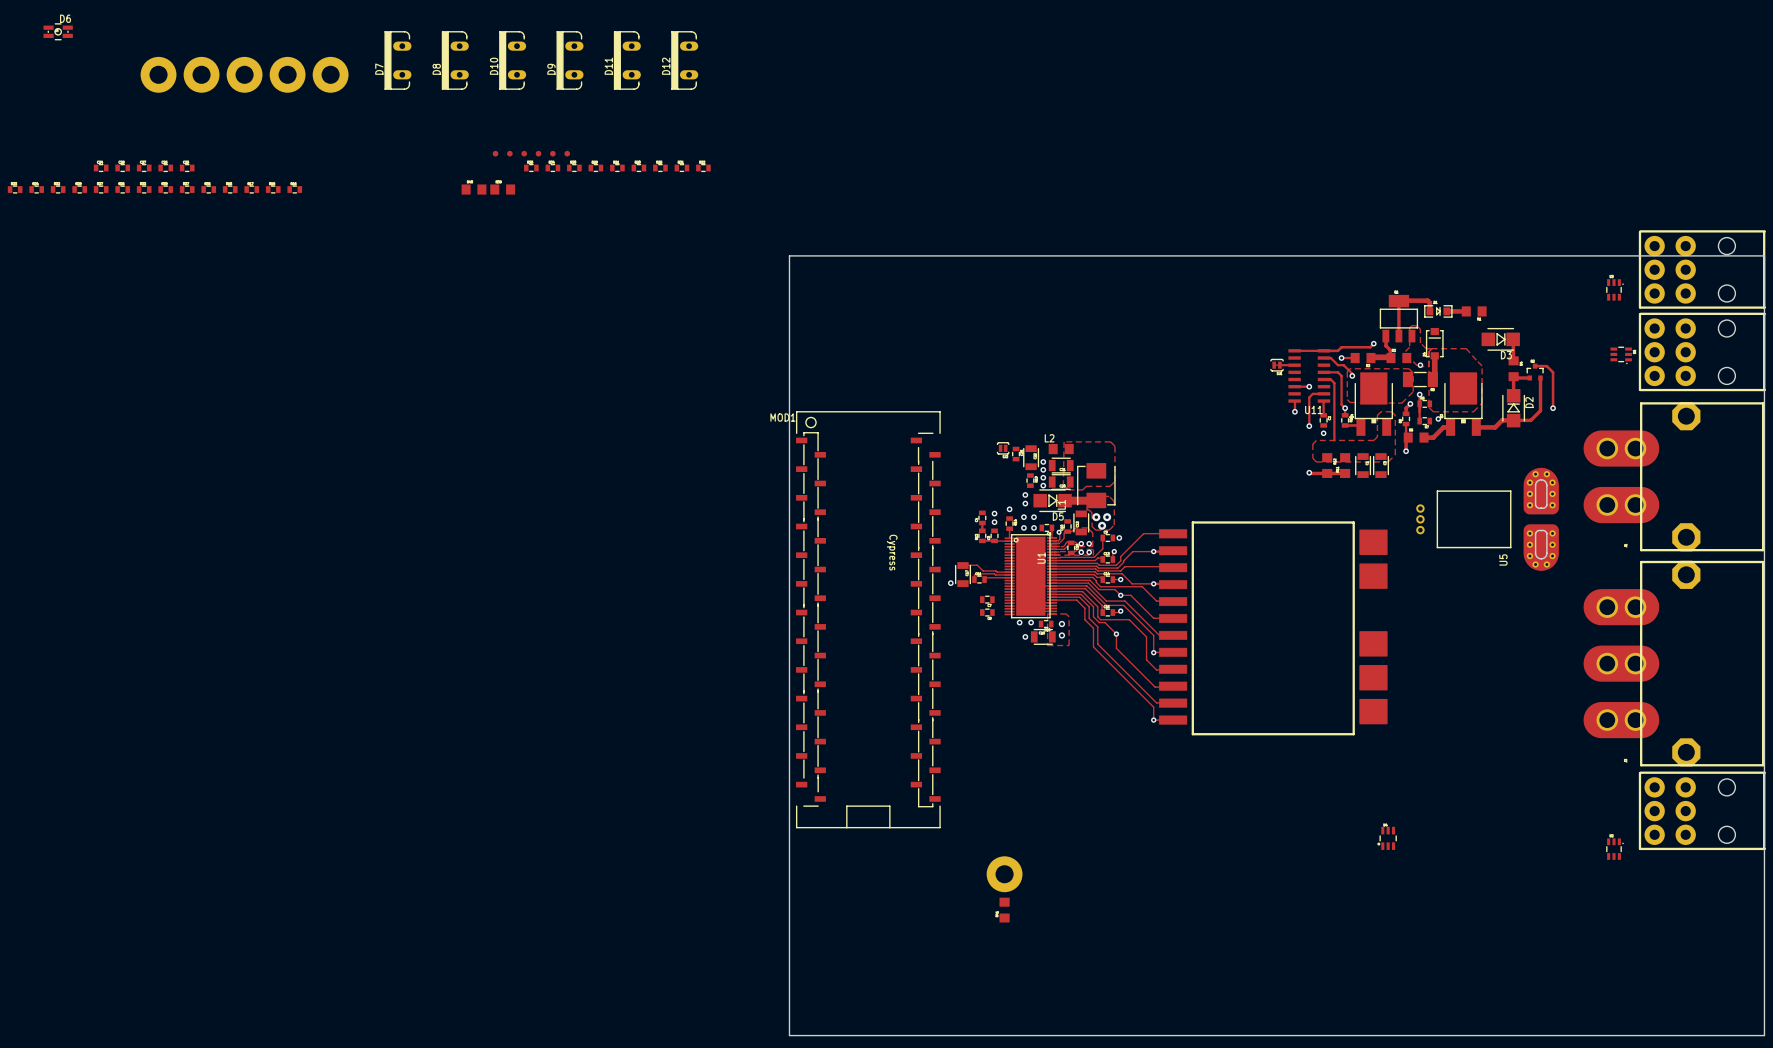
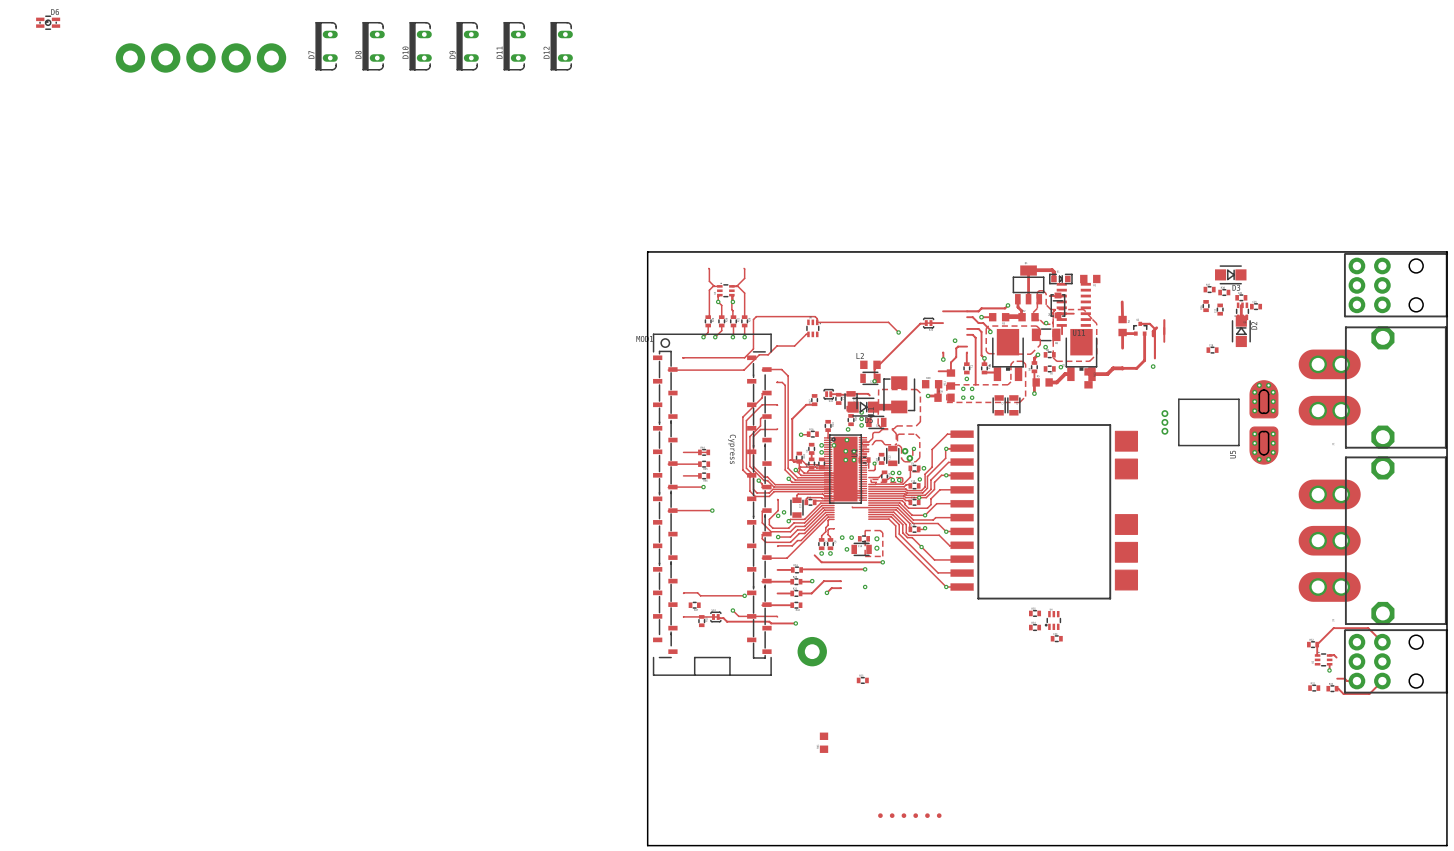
part: (495, 153) -> none
part: (509, 153) -> none
part: (524, 153) -> none
part: (538, 153) -> none
part: (552, 153) -> none
part: (567, 153) -> none
part position: (101, 168) -> (1056, 638)
part position: (122, 168) -> (1212, 350)
part rotation: 0° (144, 168) -> 90° clockwise (1220, 309)
part position: (144, 168) -> (1220, 309)
part position: (165, 168) -> (1241, 297)
part position: (187, 168) -> (1256, 306)
part position: (531, 168) -> (1035, 613)
part position: (552, 168) -> (1035, 627)
part rotation: 0° (574, 168) -> 90° clockwise (721, 321)
part position: (574, 168) -> (721, 321)
part rotation: 0° (595, 168) -> 90° clockwise (708, 321)
part position: (595, 168) -> (708, 321)
part rotation: 0° (617, 168) -> 90° clockwise (733, 321)
part position: (617, 168) -> (733, 321)
part rotation: 0° (638, 168) -> 90° clockwise (744, 321)
part position: (638, 168) -> (744, 321)
part position: (660, 168) -> (862, 680)
part position: (681, 168) -> (1314, 688)
part position: (703, 168) -> (796, 593)
part position: (15, 189) -> (796, 581)
part position: (36, 189) -> (796, 569)
part position: (58, 189) -> (1313, 644)
part: (79, 189) -> none
part: (101, 189) -> none
part: (122, 189) -> none
part position: (144, 189) -> (1332, 688)
part position: (165, 189) -> (1224, 292)
part position: (187, 189) -> (1209, 289)
part rotation: 0° (208, 189) -> 90° clockwise (1206, 306)
part position: (208, 189) -> (1206, 306)
part rotation: 0° (230, 189) -> 90° clockwise (701, 621)
part position: (230, 189) -> (701, 621)
part rotation: 0° (251, 189) -> 90° clockwise (814, 400)
part position: (251, 189) -> (814, 400)
part rotation: 0° (273, 189) -> 90° clockwise (799, 457)
part position: (273, 189) -> (799, 457)
part position: (294, 189) -> (812, 434)
part position: (474, 189) -> (932, 384)
part position: (502, 189) -> (944, 397)
part: (1702, 269) -> none
part rotation: 0° (1615, 289) -> 90° counterclockwise (725, 289)
part position: (1615, 289) -> (725, 289)
board edge: (789, 311) (789, 255) (1764, 255) (1764, 1035) -> (647, 251) (1447, 251) (1446, 845)
track: (1429, 311) (1429, 302) (1427, 300) (1399, 300) (1398, 336) -> none
part position: (1438, 311) -> (1060, 279)
track: (1446, 311) (1466, 311) -> none
part position: (1474, 311) -> (1090, 279)
part position: (1398, 318) -> (1028, 284)
track: none -> (708, 268) (709, 281) (714, 286)
track: none -> (744, 268) (744, 278) (736, 286)
track: (1385, 336) (1386, 345) (1390, 350) (1390, 357) -> none
track: (1513, 339) (1513, 360) -> none
track: (1373, 343) (1370, 347) (1341, 347) (1337, 350) (1294, 350) -> none
via: (1373, 343) -> none
part position: (1434, 343) -> (1057, 305)
track: none -> (1053, 279) (1052, 270) (1028, 270) (1028, 299)
zone outline: (1431, 348) (1429, 351) (1429, 407) (1433, 411) (1473, 411) (1482, 403) (1482, 365) (1466, 348) (1426, 348) (1420, 342) (1420, 329) (1416, 325) (1411, 325) (1409, 327) (1409, 347) (1403, 353) (1403, 360) (1413, 361) (1418, 366) (1429, 366) -> none
track: none -> (719, 286) (713, 286) (709, 290) (708, 317)
track: none -> (731, 286) (737, 286) (744, 293) (744, 317)
track: (1434, 355) (1434, 377) (1432, 379) -> none
part rotation: 0° (1621, 355) -> 90° clockwise (1241, 311)
part position: (1621, 355) -> (1241, 311)
track: (1390, 357) (1370, 358) -> none
track: (1323, 358) (1330, 358) (1337, 365) (1343, 365) (1352, 375) -> none
track: (1341, 358) (1355, 358) -> none
via: (1341, 358) -> none
part position: (1363, 358) -> (999, 317)
part position: (1398, 358) -> (1028, 317)
part position: (1277, 365) -> (928, 323)
via: (1420, 365) -> none
track: none -> (718, 296) (719, 295) (718, 301) (721, 305) (721, 317)
track: (1535, 366) (1546, 366) (1553, 372) (1553, 408) -> none
zone outline: (1350, 368) (1408, 368) (1413, 373) (1413, 391) (1401, 403) (1350, 402) (1347, 399) (1347, 371) (1350, 368) -> none
part position: (1513, 368) -> (1122, 326)
track: none -> (1017, 299) (1017, 307) (1021, 310) (1021, 316)
via: none -> (718, 301)
track: none -> (732, 301) (731, 295) (733, 317)
via: none -> (732, 301)
track: (1323, 372) (1337, 372) (1341, 375) (1341, 404) (1345, 408) (1345, 415) -> none
track: none -> (1122, 301) (1122, 319)
part position: (1535, 372) -> (1140, 328)
via: (1352, 375) -> none
track: none -> (1007, 305) (1005, 308) (981, 308) (978, 311) (943, 311)
via: none -> (1007, 305)
track: (1513, 378) (1529, 378) -> none
track: (1540, 378) (1540, 410) (1530, 420) (1502, 420) (1495, 427) (1476, 427) -> none
track: (1323, 379) (1330, 379) (1334, 383) (1334, 440) -> none
part position: (1420, 379) -> (1046, 334)
zone outline: none -> (1055, 309) (1053, 311) (1053, 357) (1056, 361) (1089, 361) (1096, 354) (1096, 323) (1083, 309) (1050, 309) (1046, 304) (1046, 293) (1043, 290) (1039, 290) (1037, 292) (1037, 308) (1032, 313) (1032, 319) (1040, 320) (1044, 324) (1053, 324)
via: (1309, 386) -> none
track: none -> (1021, 316) (1005, 317)
track: none -> (967, 317) (972, 317) (978, 323) (983, 323) (990, 331)
track: none -> (981, 317) (992, 317)
via: none -> (981, 317)
track: (1323, 393) (1312, 393) (1309, 397) (1309, 426) -> none
via: (1419, 394) -> none
track: none -> (926, 323) (920, 323) (874, 369) (874, 381)
track: none -> (930, 323) (943, 323)
via: none -> (1046, 323)
track: none -> (1140, 323) (1149, 323) (1154, 328) (1154, 358)
track: none -> (708, 325) (708, 332) (703, 337)
track: none -> (721, 325) (721, 330) (715, 337)
track: none -> (733, 325) (732, 337)
track: none -> (744, 325) (744, 337)
zone outline: none -> (988, 326) (1036, 326) (1040, 329) (1040, 344) (1030, 354) (988, 353) (986, 351) (986, 328) (988, 326)
track: (1323, 401) (1323, 415) -> none
via: (1410, 403) -> none
part position: (1424, 403) -> (1049, 354)
part: none -> (813, 328)
part position: (1373, 404) -> (1007, 355)
part position: (1463, 404) -> (1081, 355)
track: none -> (967, 328) (978, 328) (981, 331) (981, 355) (984, 358) (984, 364)
via: none -> (990, 331)
via: (1345, 408) -> none
via: (1553, 408) -> none
track: none -> (898, 332) (888, 322) (817, 322) (815, 316) (756, 316) (753, 319) (753, 348) (744, 357) (683, 358)
via: none -> (898, 332)
track: none -> (1122, 332) (1122, 348)
track: none -> (1122, 333) (1135, 333)
track: none -> (1144, 333) (1144, 360) (1136, 368) (1113, 368) (1107, 374) (1092, 374)
track: none -> (808, 334) (794, 346) (776, 346) (768, 354) (759, 354) (744, 370) (668, 370)
via: (1294, 411) -> none
zone outline: (1380, 411) (1391, 411) (1395, 415) (1395, 454) (1388, 461) (1316, 461) (1312, 458) (1312, 444) (1316, 440) (1373, 440) (1377, 436) (1377, 415) (1380, 411) -> none
track: none -> (967, 334) (972, 334) (975, 337) (975, 384)
via: none -> (703, 337)
via: none -> (715, 337)
via: none -> (732, 337)
via: none -> (744, 337)
part position: (1406, 418) -> (1034, 367)
via: (1438, 418) -> none
via: none -> (955, 340)
part position: (1323, 420) -> (966, 368)
part position: (1345, 420) -> (984, 368)
part position: (1424, 421) -> (1049, 368)
track: (1406, 424) (1406, 435) (1408, 437) (1406, 439) (1406, 451) -> none
track: (1345, 425) (1358, 425) (1360, 427) (1358, 429) -> none
track: none -> (967, 346) (956, 348) (956, 357) (950, 362) (950, 373) (938, 371)
via: (1309, 426) -> none
via: none -> (1045, 347)
track: (1450, 427) (1443, 427) (1433, 437) (1424, 437) -> none
via: (1323, 433) -> none
track: none -> (943, 352) (943, 359)
track: none -> (967, 352) (966, 364)
track: none -> (1037, 354) (1034, 358) (1034, 363)
via: none -> (1037, 354)
part position: (1416, 437) -> (1042, 382)
zone outline: (1064, 441) (1063, 484) (1068, 489) (1082, 489) (1086, 486) (1109, 486) (1114, 481) (1114, 446) (1110, 441) (1064, 441) -> (878, 389) (878, 424) (882, 428) (893, 428) (896, 425) (916, 425) (920, 421) (920, 393) (916, 389) (878, 389)
via: none -> (984, 358)
via: none -> (943, 359)
zone outline: none -> (1013, 361) (1022, 361) (1025, 364) (1025, 396) (1019, 402) (946, 402) (946, 384) (1007, 384) (1010, 381) (1010, 364) (1013, 361)
part position: (1003, 448) -> (828, 394)
via: none -> (1060, 367)
part position: (1016, 454) -> (838, 398)
track: none -> (762, 370) (781, 369) (788, 375) (788, 468) (797, 477) (834, 477)
part position: (1031, 457) -> (851, 401)
track: none -> (1034, 371) (1036, 382) (1034, 393)
track: none -> (984, 372) (995, 372) (997, 374) (995, 375)
track: none -> (1070, 374) (1065, 374) (1056, 382) (1049, 382)
via: (1043, 461) -> none
part position: (1345, 465) -> (950, 379)
part position: (1363, 465) -> (999, 405)
part position: (1380, 465) -> (1013, 405)
via: none -> (966, 378)
track: none -> (777, 381) (785, 385) (785, 470) (795, 480) (834, 480)
via: (1043, 469) -> none
via: none -> (874, 381)
track: (1309, 472) (1345, 473) -> none
via: (1309, 472) -> none
via: (1043, 477) -> none
via: none -> (963, 388)
via: none -> (972, 388)
part position: (1030, 480) -> (851, 420)
part position: (1061, 482) -> (876, 422)
track: none -> (762, 393) (762, 397) (742, 417) (742, 470) (749, 477) (749, 491) (755, 496) (769, 496) (774, 491) (834, 491)
track: none -> (830, 394) (869, 395)
via: none -> (1034, 393)
via: (1043, 485) -> none
track: none -> (928, 395) (938, 395) (938, 384) (938, 384) (938, 397)
via: none -> (928, 395)
via: none -> (963, 397)
via: none -> (972, 397)
via: (1025, 494) -> none
zone outline: (1088, 496) (1109, 496) (1114, 501) (1114, 525) (1109, 530) (1095, 530) (1092, 526) (1092, 512) (1087, 510) (1088, 496) -> (898, 434) (915, 434) (919, 438) (919, 457) (915, 461) (904, 461) (901, 458) (901, 447) (897, 445) (898, 434)
track: none -> (814, 404) (806, 404) (792, 418) (792, 460) (799, 461) (799, 468) (804, 473) (834, 473)
track: none -> (777, 405) (762, 404) (746, 420) (746, 468) (753, 475) (753, 489) (757, 492) (769, 492) (772, 489) (834, 489)
via: (1025, 503) -> none
via: none -> (861, 412)
via: (1009, 509) -> none
track: none -> (762, 417) (760, 425) (749, 436) (749, 466) (764, 480) (767, 480) (773, 487) (834, 487)
via: (994, 513) -> none
via: none -> (861, 418)
part position: (982, 517) -> (811, 448)
via: (1023, 517) -> none
via: (1033, 517) -> none
via: (1096, 517) -> none
via: (1107, 517) -> none
track: (982, 522) (982, 530) -> (811, 453) (811, 459)
via: (994, 522) -> none
via: none -> (861, 425)
part position: (1081, 522) -> (892, 455)
via: (1102, 525) -> none
part position: (1067, 526) -> (881, 458)
track: none -> (777, 428) (760, 429) (753, 436) (753, 466) (764, 477) (767, 477) (775, 484) (834, 484)
via: (1023, 527) -> none
part position: (1046, 527) -> (864, 460)
track: (1051, 527) (1052, 537) -> (868, 460) (868, 468)
track: (1059, 532) (1059, 539) (1052, 540) -> (874, 463) (875, 469) (868, 470)
via: (1059, 532) -> none
track: none -> (808, 434) (801, 434)
track: (1155, 533) (1143, 533) (1120, 556) (1120, 560) (1116, 565) (1052, 563) -> (947, 434) (932, 449) (932, 467) (925, 474) (925, 487) (921, 490) (868, 489)
via: none -> (801, 434)
part position: (982, 535) -> (811, 463)
part position: (994, 535) -> (821, 463)
part position: (1107, 537) -> (914, 468)
via: (1119, 537) -> none
track: (1102, 538) (1102, 548) (1094, 557) (1052, 557) -> (910, 468) (910, 477) (903, 484) (868, 484)
track: (982, 540) (1009, 541) -> none
via: none -> (846, 440)
track: (1071, 542) (1064, 549) (1052, 549) -> (884, 472) (878, 477) (868, 477)
via: (1081, 543) -> none
via: (1089, 543) -> none
via: none -> (821, 445)
via: none -> (834, 445)
part position: (1071, 548) -> (884, 476)
zone outline: (1077, 549) (1092, 549) (1093, 554) (1054, 555) (1054, 551) (1075, 551) (1077, 549) -> (889, 477) (902, 477) (902, 481) (871, 482) (871, 479) (888, 479) (889, 477)
track: (1153, 551) (1132, 551) (1117, 568) (1052, 566) -> (946, 448) (945, 458) (927, 476) (927, 488) (921, 492)
via: (1081, 552) -> none
via: (1089, 552) -> none
via: none -> (845, 451)
via: none -> (853, 451)
via: none -> (905, 451)
track: none -> (683, 452) (708, 452)
part: none -> (704, 452)
via: none -> (821, 452)
track: (1102, 559) (1097, 558) (1095, 560) (1052, 560) -> (910, 485) (868, 486)
part position: (1107, 559) -> (914, 485)
via: none -> (909, 458)
via: none -> (845, 460)
via: none -> (853, 460)
track: (1172, 566) (1125, 566) (1120, 570) (1052, 569) -> none
track: none -> (962, 462) (948, 462) (930, 480) (930, 489) (925, 495) (868, 493)
via: none -> (874, 463)
track: none -> (668, 464) (699, 464)
part: none -> (704, 464)
track: (1052, 571) (1122, 573) (1132, 583) (1147, 583) -> (868, 496) (926, 497) (934, 489) (934, 482) (941, 475)
part position: (962, 574) -> (796, 507)
track: (1052, 574) (1094, 574) (1102, 579) -> (868, 498) (903, 498) (910, 502)
via: none -> (923, 468)
track: none -> (795, 470) (801, 475) (834, 475)
via: none -> (795, 470)
track: (1052, 577) (1092, 577) (1100, 586) (1142, 586) (1156, 601) (1172, 601) -> none
part position: (979, 579) -> (810, 502)
part position: (1107, 579) -> (914, 502)
via: (1120, 579) -> none
track: (1052, 580) (1089, 580) (1099, 589) (1114, 589) (1120, 595) (1130, 595) (1153, 618) (1162, 618) -> none
via: none -> (892, 472)
via: none -> (899, 472)
via: (950, 583) -> none
track: (1052, 583) (1088, 583) (1106, 601) (1125, 601) (1160, 636) -> none
track: none -> (683, 475) (699, 475)
part: none -> (704, 475)
track: (1031, 585) (1086, 585) (1106, 605) -> (868, 491) (907, 492)
track: none -> (788, 478) (792, 482) (834, 482)
via: none -> (788, 478)
track: (1052, 588) (1085, 588) (1102, 605) (1102, 612) -> (868, 509) (896, 509) (909, 523) (910, 529)
via: none -> (919, 479)
via: none -> (892, 480)
via: none -> (899, 480)
track: none -> (758, 480) (762, 484) (762, 487)
via: none -> (758, 480)
track: (1052, 591) (1082, 591) (1097, 606) (1097, 616) (1100, 619) (1129, 619) (1146, 636) (1146, 659) (1158, 669) -> (868, 512) (893, 512) (906, 524) (906, 532) (908, 535) (939, 535) (949, 545)
track: (1052, 594) (1081, 594) (1093, 606) (1093, 616) (1099, 622) (1104, 622) (1116, 634) (1116, 648) (1155, 687) -> none
via: (1120, 595) -> none
track: (1052, 597) (1079, 597) (1089, 606) (1089, 618) (1094, 623) -> (852, 507) (897, 507)
track: none -> (703, 487) (668, 487)
via: none -> (703, 487)
part rotation: 0° (987, 599) -> 90° clockwise (821, 544)
part position: (987, 599) -> (821, 544)
track: (1052, 600) (1076, 600) (1084, 608) (1084, 619) (1093, 628) (1093, 646) (1100, 654) -> (868, 514) (892, 514) (902, 524) (902, 532)
track: none -> (962, 489) (940, 489) (930, 498) (930, 504) (927, 508) (908, 508) (902, 500) (868, 500)
track: (1123, 605) (1153, 635) (1153, 652) -> (900, 510) (913, 523) (938, 523) (946, 531)
track: none -> (834, 496) (798, 494) (796, 500)
track: (1120, 611) (1112, 612) -> (925, 528) (918, 529)
part rotation: 0° (987, 612) -> 90° clockwise (830, 544)
part position: (987, 612) -> (830, 544)
track: none -> (834, 498) (807, 497) (806, 502)
part position: (1107, 612) -> (914, 529)
track: none -> (777, 499) (778, 510) (769, 519) (769, 524) (772, 528) (788, 528) (794, 522) (804, 522) (822, 505) (834, 505)
zone outline: (1047, 613) (1047, 645) (1069, 645) (1069, 616) (1066, 613) (1047, 613) -> (865, 530) (865, 556) (882, 556) (882, 532) (880, 530) (865, 530)
track: none -> (834, 500) (814, 502)
track: none -> (834, 503) (820, 503) (804, 519) (790, 519) (788, 521)
track: none -> (868, 502) (899, 502) (912, 515) (925, 515) (936, 503) (953, 503)
track: none -> (868, 505) (898, 505) (913, 519) (962, 517)
via: (1019, 622) -> none
via: (1031, 622) -> none
track: none -> (834, 507) (823, 507) (804, 526) (795, 526) (790, 531) (771, 531) (762, 522) (762, 511)
part position: (1046, 624) -> (863, 538)
via: (1061, 624) -> none
track: none -> (712, 510) (668, 511)
via: none -> (712, 510)
track: none -> (834, 510) (824, 510) (804, 529) (797, 529) (790, 537) (778, 537)
track: (1097, 626) (1097, 644) (1156, 702) -> (868, 516) (891, 516) (899, 524) (899, 534) (938, 572) (948, 572)
via: none -> (784, 512)
track: none -> (834, 512) (825, 512) (804, 533) (799, 533) (790, 542) (765, 542) (762, 538) (762, 534)
track: none -> (834, 514) (826, 514) (801, 540) (797, 540) (792, 545) (777, 546)
via: none -> (925, 515)
via: none -> (778, 515)
track: none -> (834, 517) (828, 517) (786, 558) (762, 558)
via: (1116, 634) -> none
via: (1061, 635) -> none
via: (1025, 636) -> none
part position: (1043, 636) -> (861, 549)
track: none -> (834, 519) (828, 520) (821, 539)
track: none -> (868, 519) (889, 519) (895, 525) (895, 536) (946, 587)
via: none -> (788, 521)
track: none -> (834, 528) (828, 529) (830, 539)
via: none -> (925, 528)
via: none -> (778, 537)
via: none -> (842, 537)
via: none -> (851, 537)
track: (1106, 659) (1153, 707) (1153, 720) -> (907, 537) (912, 537) (934, 559) (947, 559)
via: none -> (876, 538)
via: none -> (921, 547)
via: none -> (876, 548)
via: none -> (846, 549)
via: none -> (821, 553)
via: none -> (830, 553)
track: none -> (814, 555) (821, 562) (882, 562)
via: none -> (882, 562)
track: none -> (865, 569) (801, 569)
via: none -> (865, 569)
track: none -> (777, 569) (792, 569)
track: none -> (812, 581) (800, 581)
via: none -> (812, 581)
track: none -> (762, 581) (792, 581)
track: none -> (840, 581) (824, 581) (811, 593) (800, 593)
via: none -> (865, 587)
track: none -> (840, 588) (831, 588) (826, 592)
track: none -> (683, 593) (697, 592) (700, 595) (744, 595)
track: none -> (777, 593) (792, 593)
via: none -> (826, 592)
via: none -> (744, 595)
part: none -> (694, 605)
track: none -> (762, 605) (792, 605)
part: none -> (796, 605)
track: none -> (732, 610) (738, 616) (777, 616)
via: none -> (732, 610)
track: none -> (683, 616) (701, 616)
track: none -> (701, 616) (713, 616)
part: none -> (715, 616)
track: none -> (718, 616) (727, 621) (795, 623)
via: none -> (795, 623)
track: none -> (1382, 642) (1368, 628) (1333, 628) (1317, 644) (1317, 655)
track: none -> (1329, 655) (1334, 655) (1336, 657)
track: none -> (1329, 664) (1329, 670)
via: none -> (1329, 670)
track: none -> (1337, 678) (1356, 681)
track: none -> (1382, 681) (1369, 693) (1343, 693) (1336, 688)
part position: (1387, 838) -> (1052, 620)
part rotation: 0° (1615, 849) -> 90° counterclockwise (1323, 659)
part position: (1615, 849) -> (1323, 659)
part position: (1004, 874) -> (812, 651)
part: none -> (880, 815)
part: none -> (892, 815)
part: none -> (903, 815)
part: none -> (915, 815)
part: none -> (927, 815)
part: none -> (939, 815)

